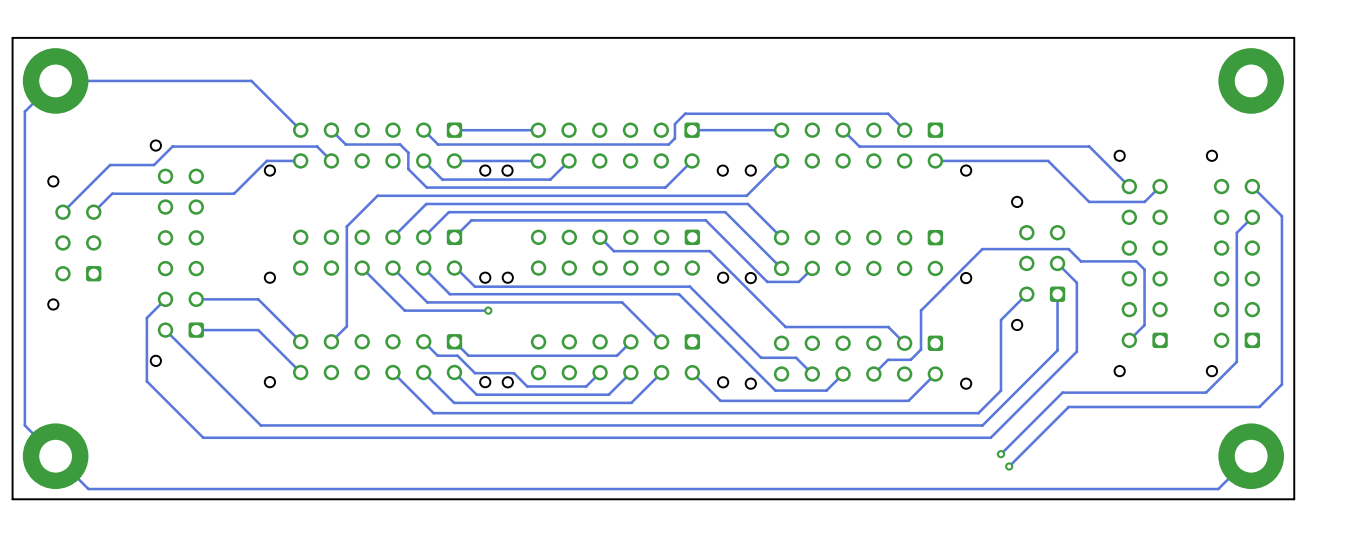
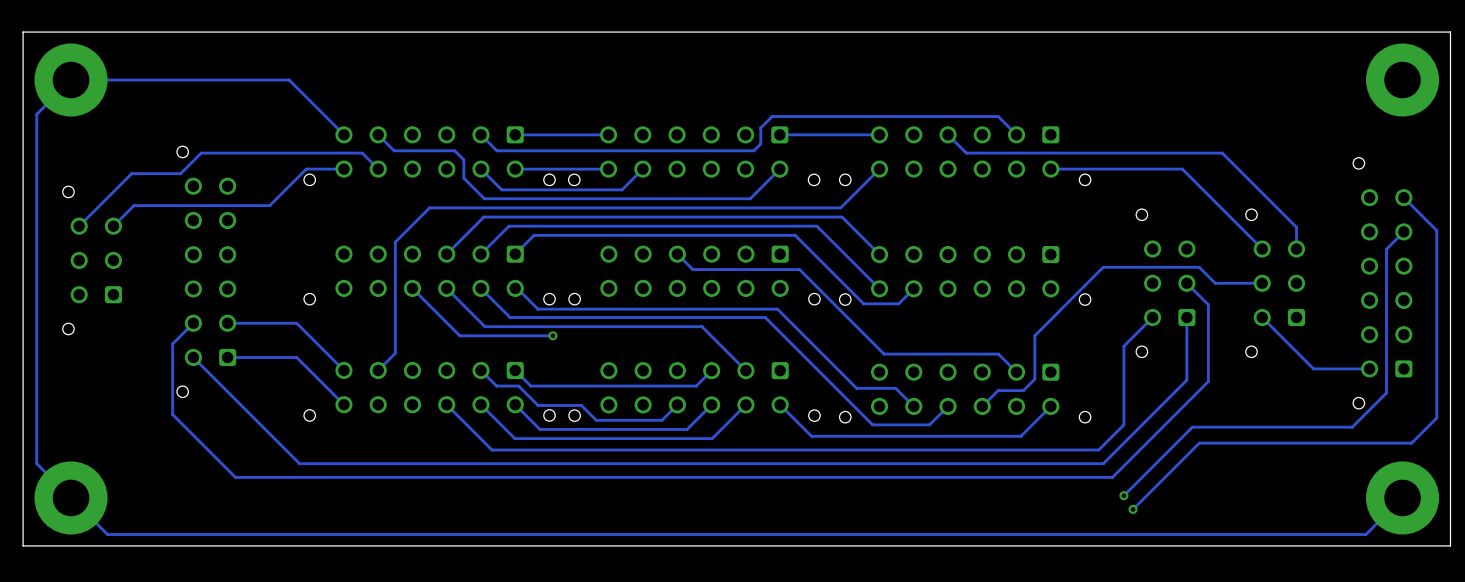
part footprint: [1114, 150, 1168, 377] -> [1245, 209, 1306, 358]
track: (1048, 160) (1089, 201) (1144, 201) (1160, 186) -> (1176, 169) (1182, 169) (1262, 249)
track: none -> (1266, 197) (1296, 227) (1296, 249)
track: (1080, 261) (1136, 261) (1144, 269) (1144, 325) (1129, 340) -> (1212, 281) (1215, 283) (1262, 283)
track: none -> (1262, 317) (1313, 368) (1369, 368)

